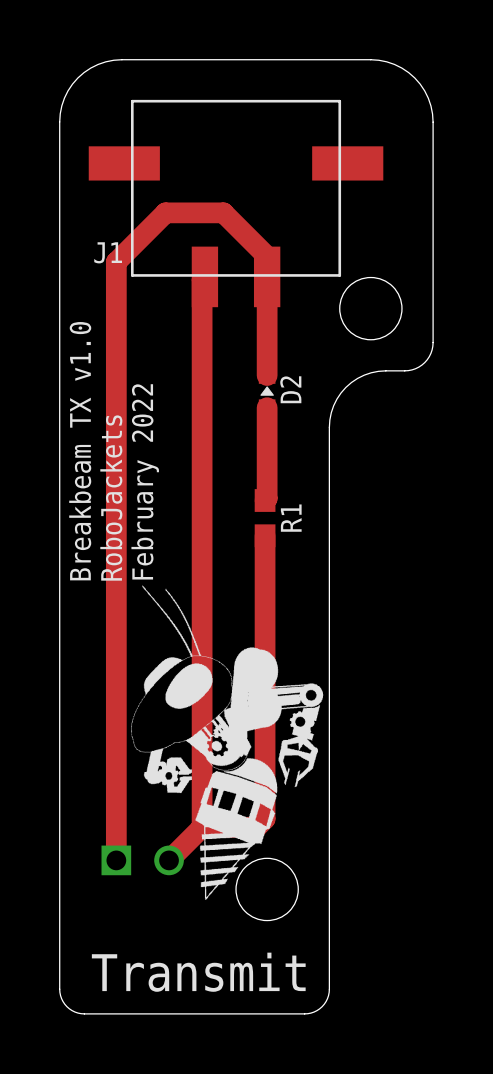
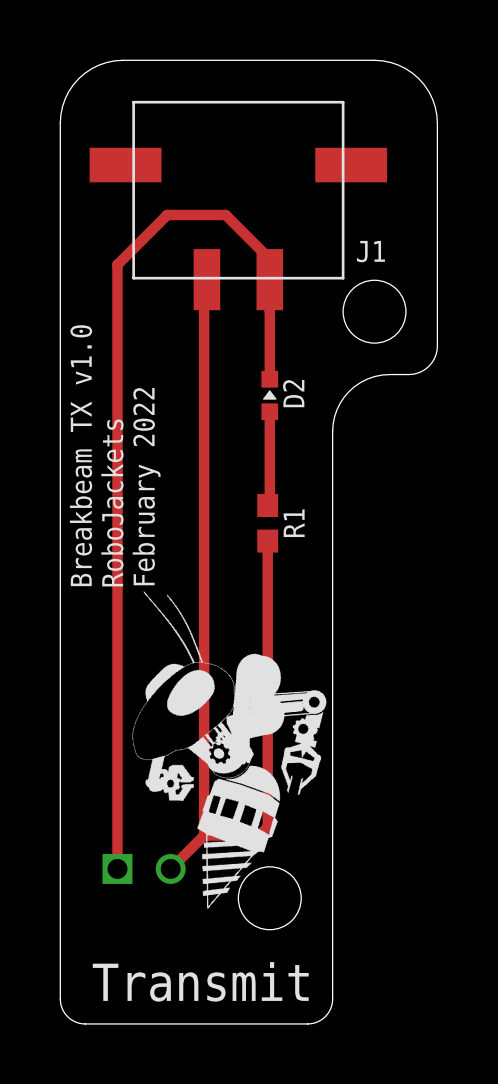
J1 name: none -> J1 (370, 251)
text: J1 (108, 252) -> none
track width: thick (204, 276) (202, 279) (202, 827) -> thin (206, 279) (204, 282) (204, 835)
track width: thick (267, 375) (267, 256) (223, 212) (165, 212) (116, 262) (116, 860) -> thin (269, 379) (269, 259) (225, 214) (167, 214) (117, 264) (117, 868)
track width: thick (267, 407) (267, 498) (265, 500) -> thin (269, 411) (269, 503) (267, 505)
track width: thick (265, 535) (265, 818) (256, 827) (202, 827) -> thin (267, 541) (267, 827) (259, 835) (204, 835)
track width: thick (202, 827) (169, 860) -> thin (204, 835) (170, 868)

